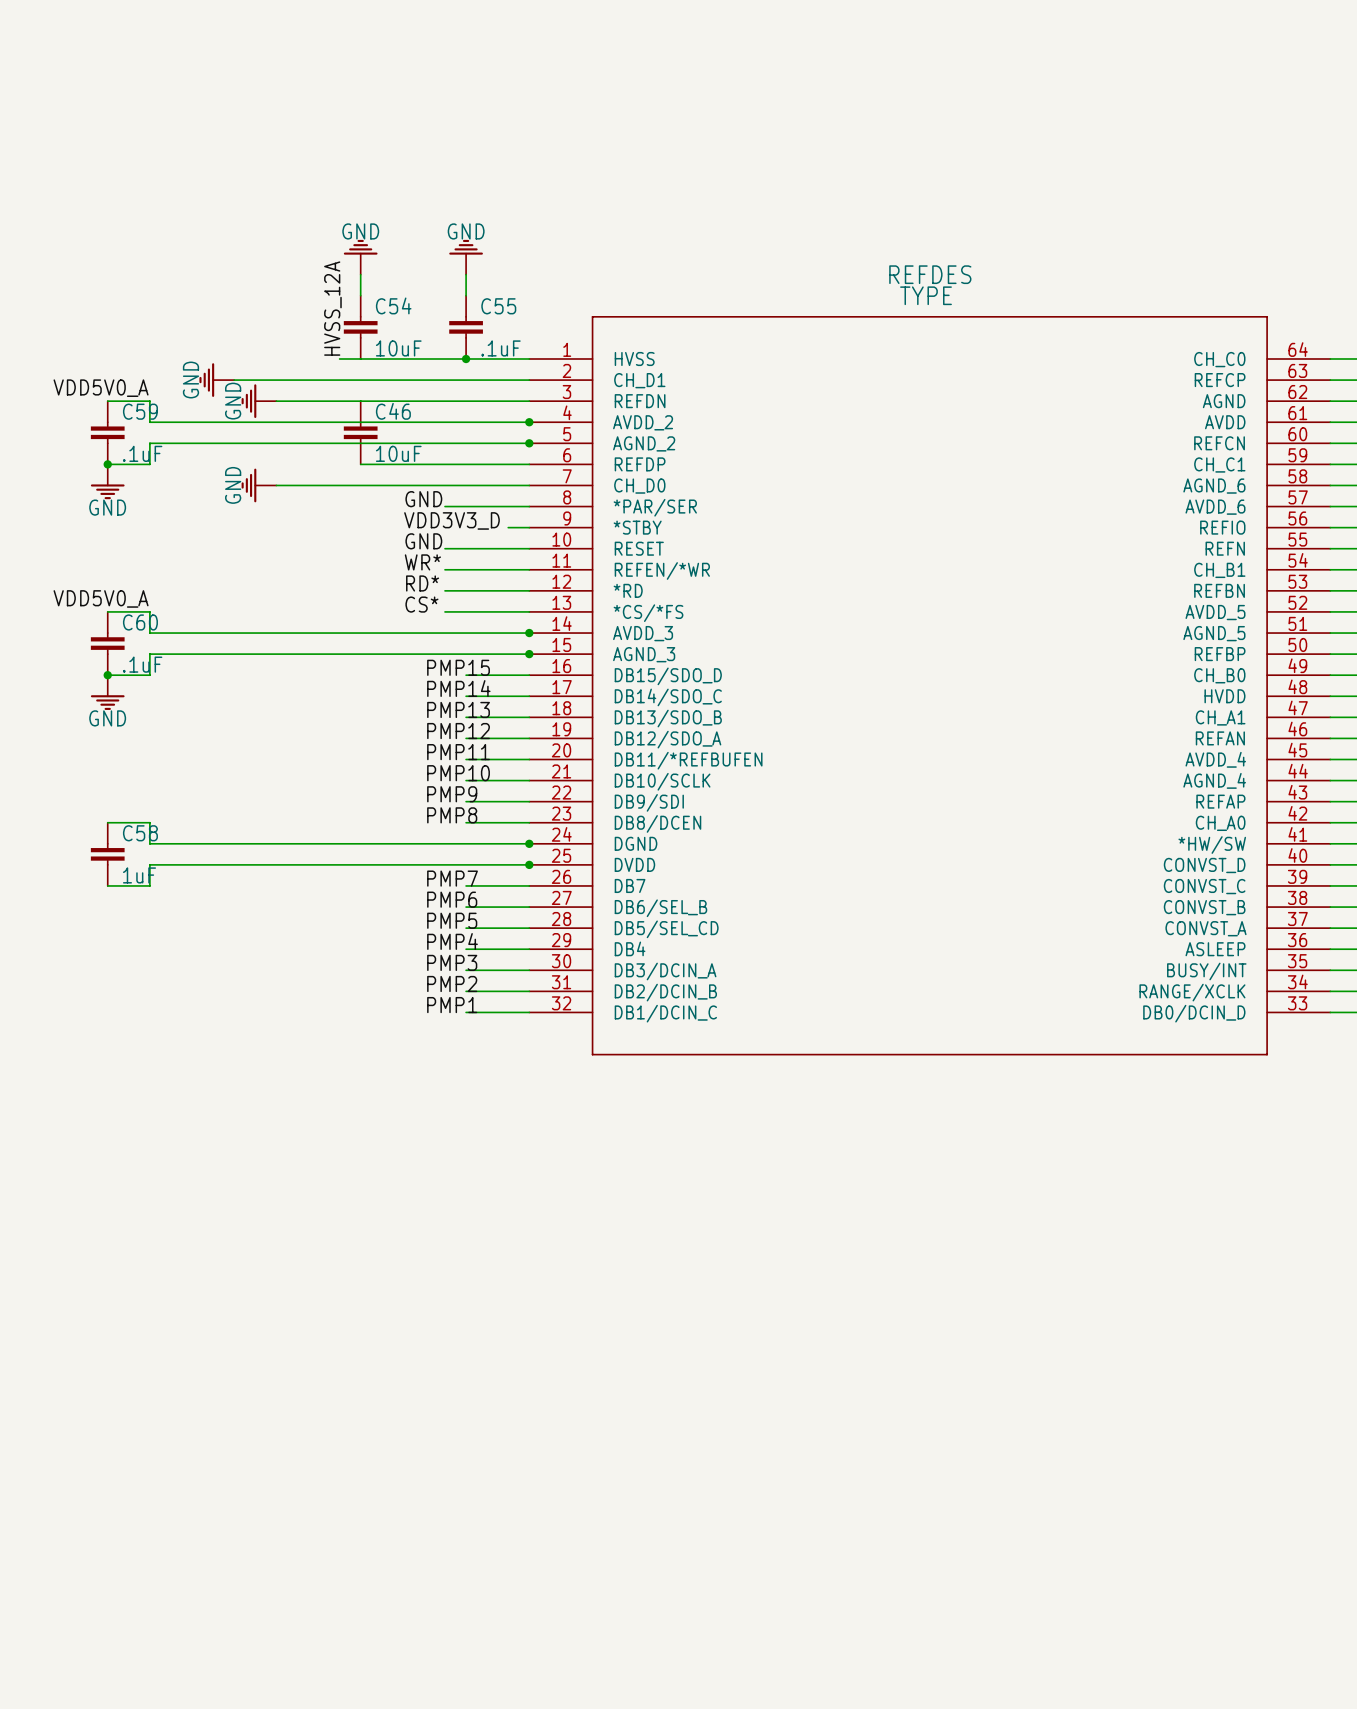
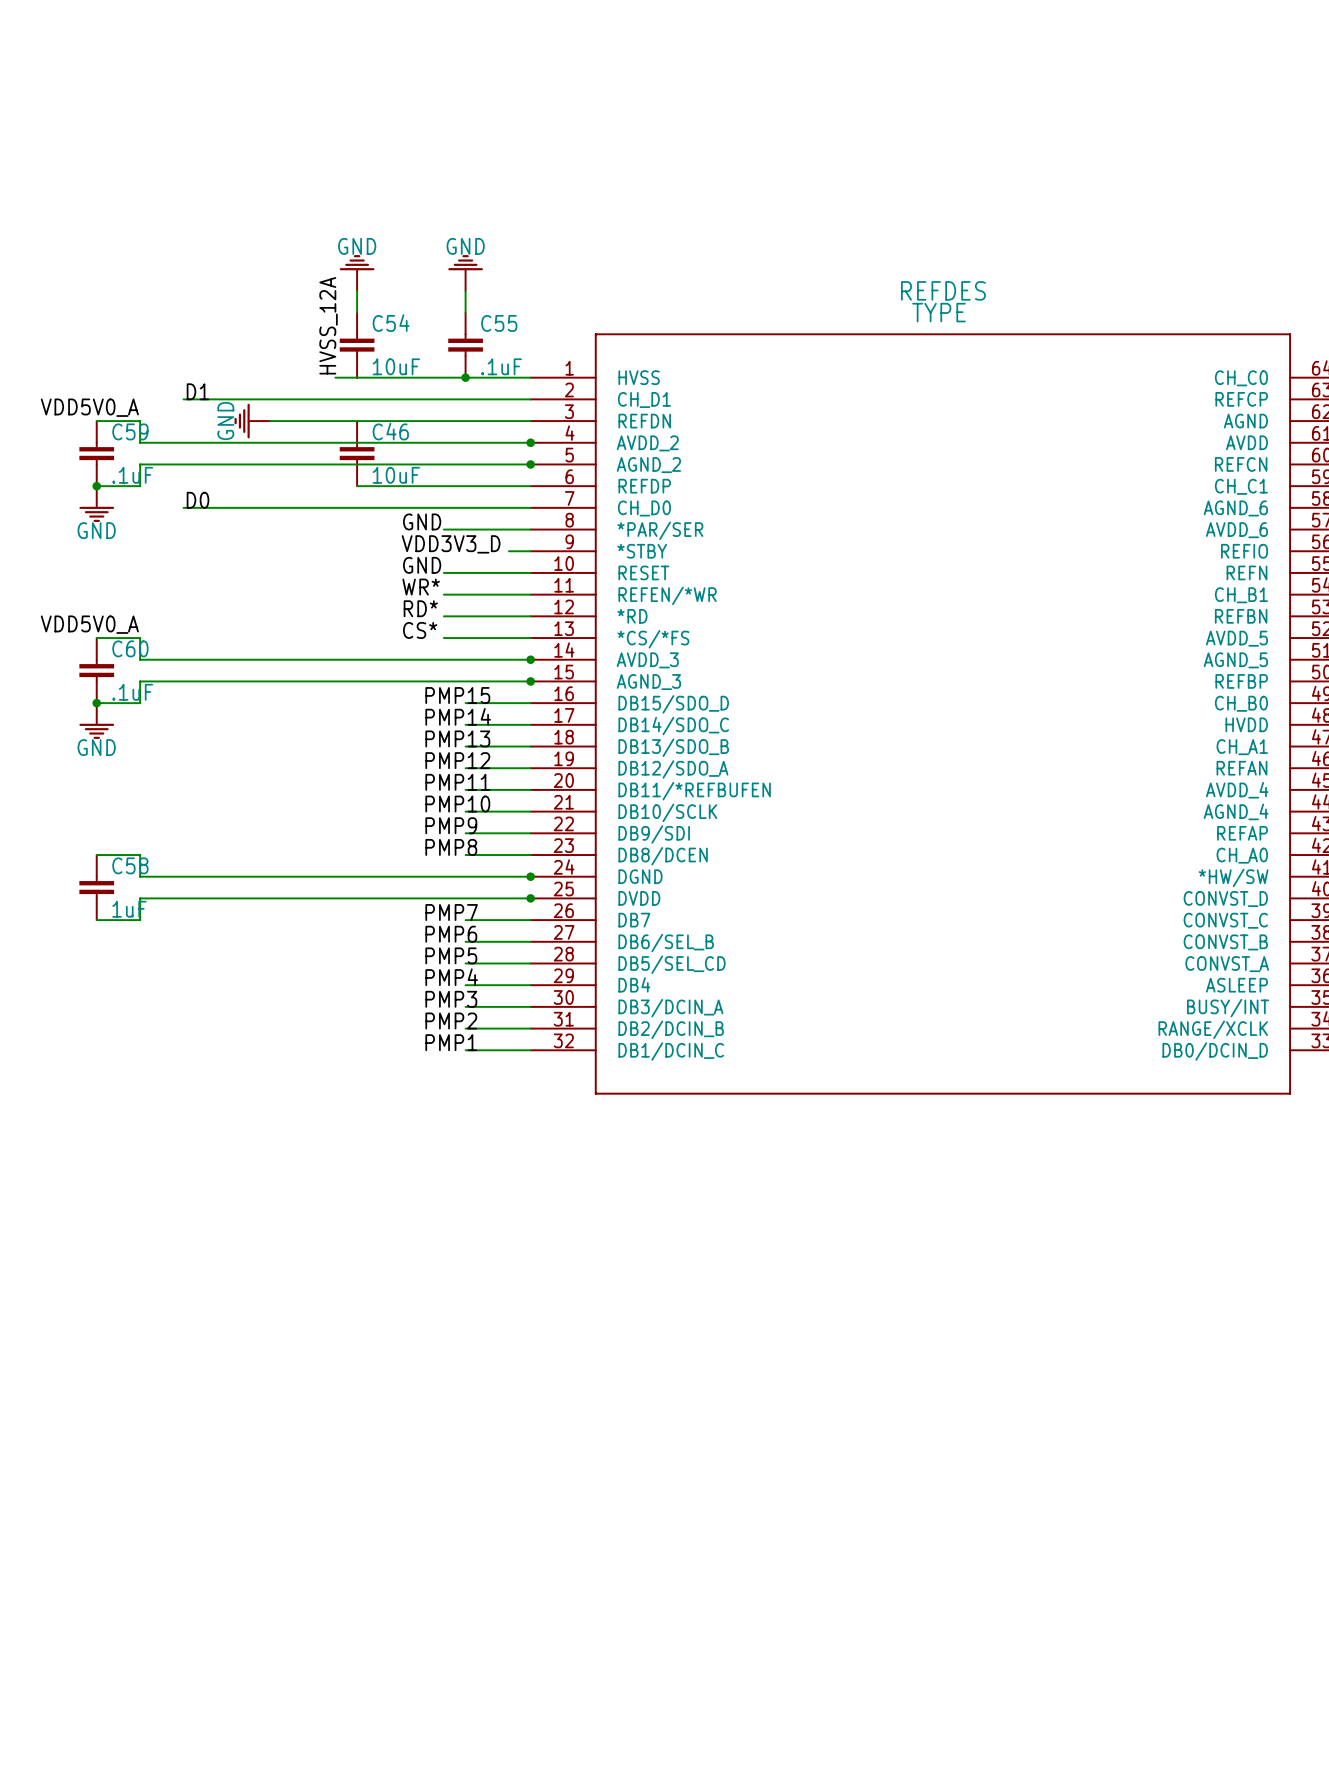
label: none -> D1 (197, 391)
power symbol: GND (216, 380) -> none
label: none -> D0 (197, 500)
wire: none -> (183, 507) (270, 507)
power symbol: GND (258, 485) -> none

